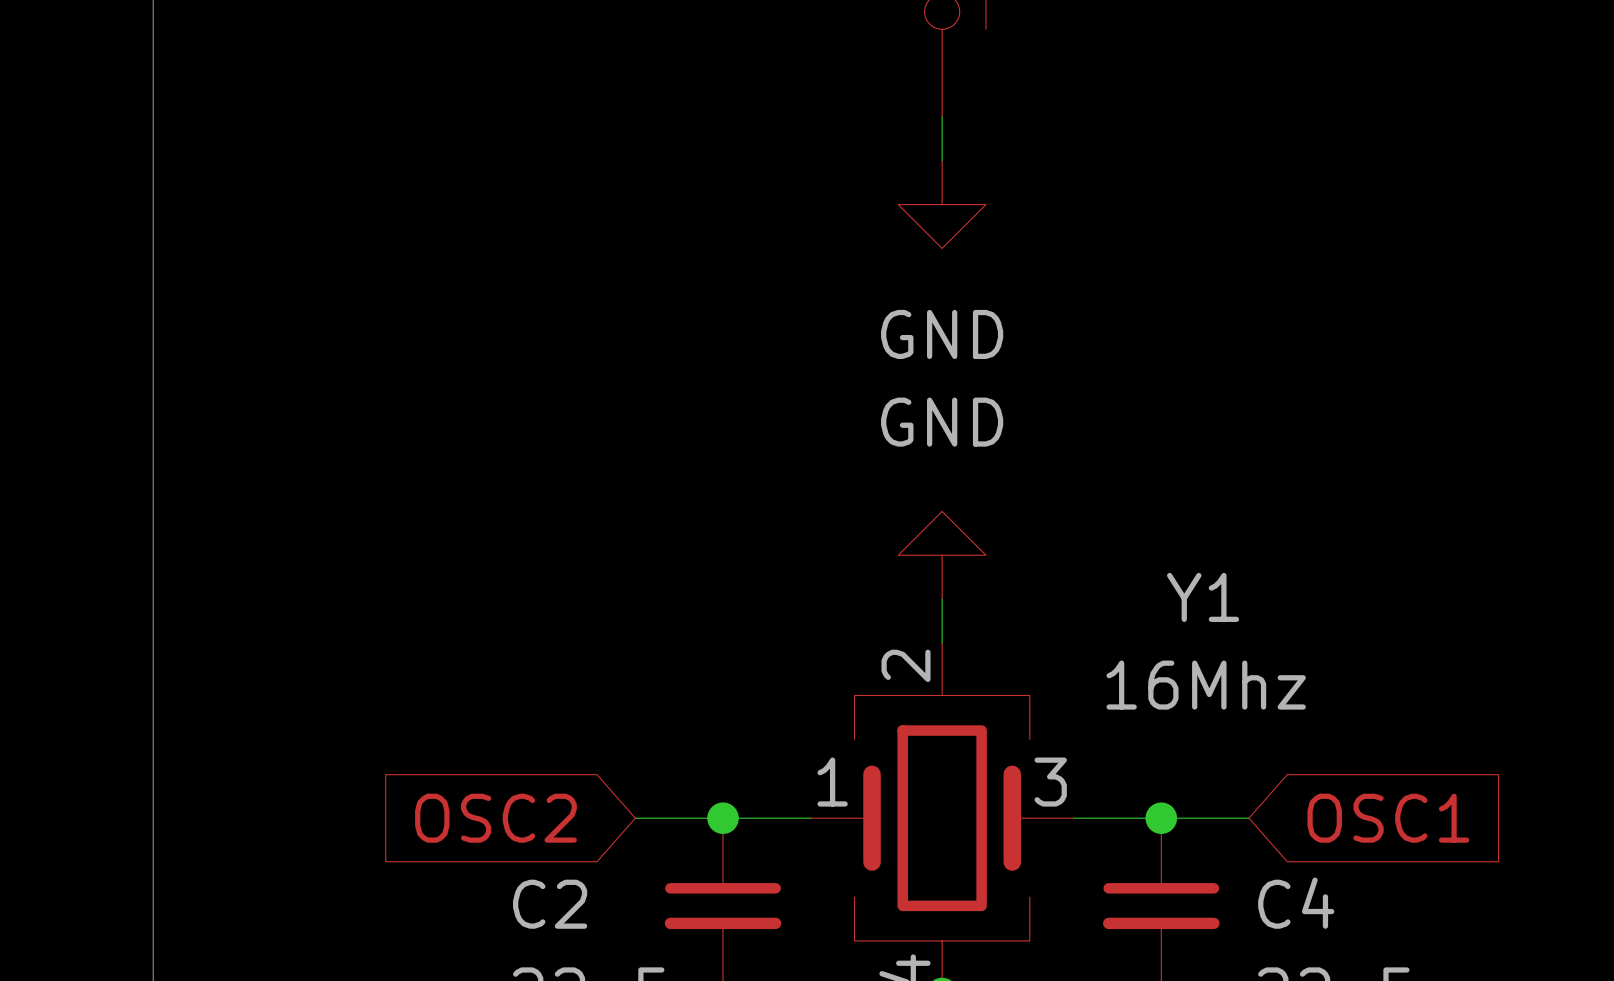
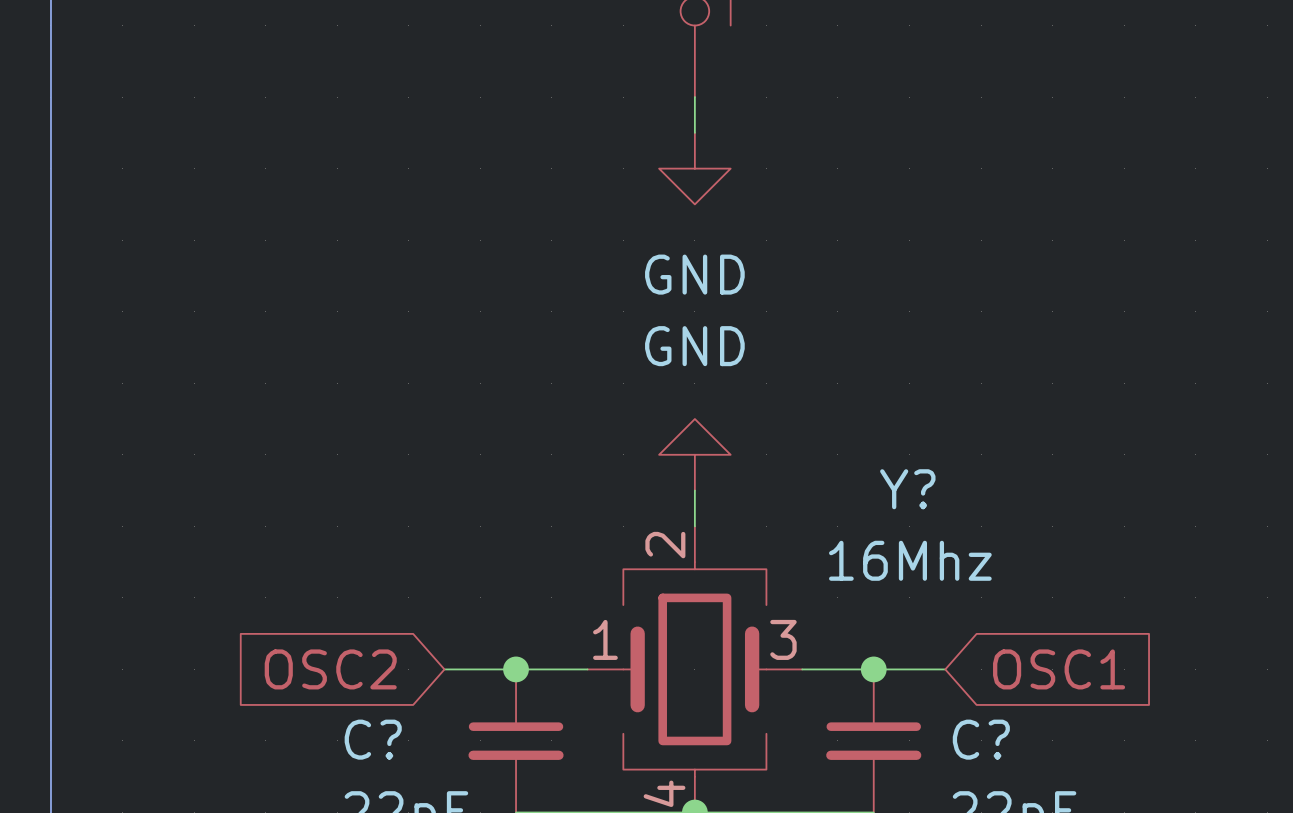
Y1 name: Y1 (1203, 597) -> Y? (907, 489)
C4 name: C4 (1296, 903) -> C? (981, 739)
C2 name: C2 (550, 904) -> C? (373, 739)

